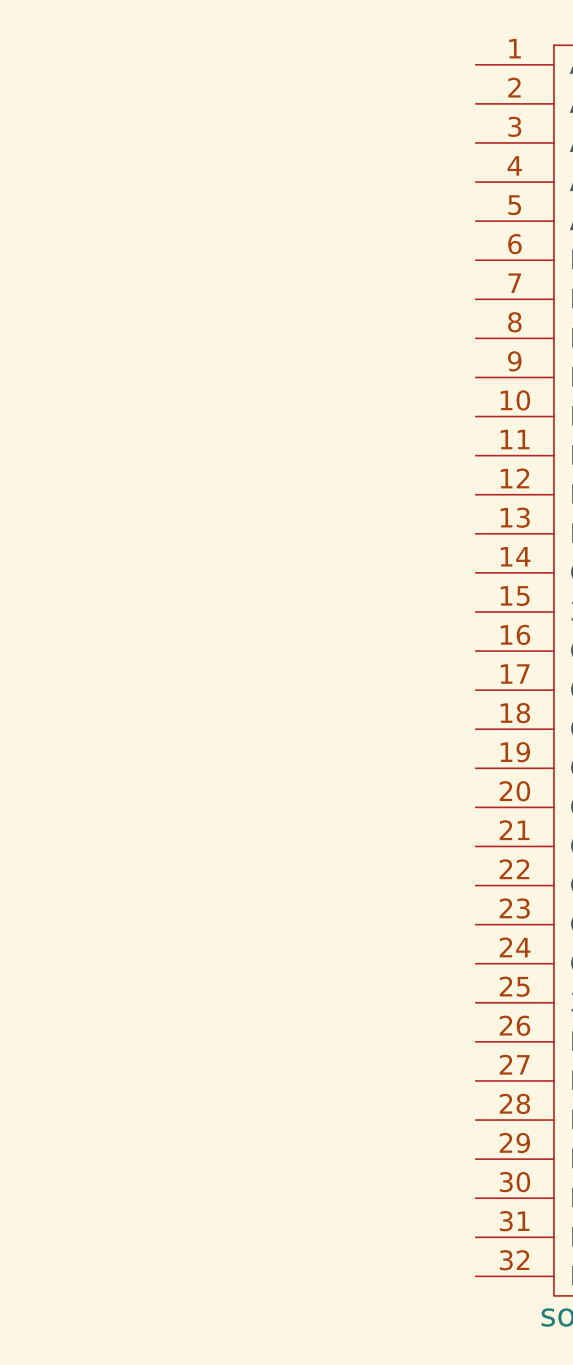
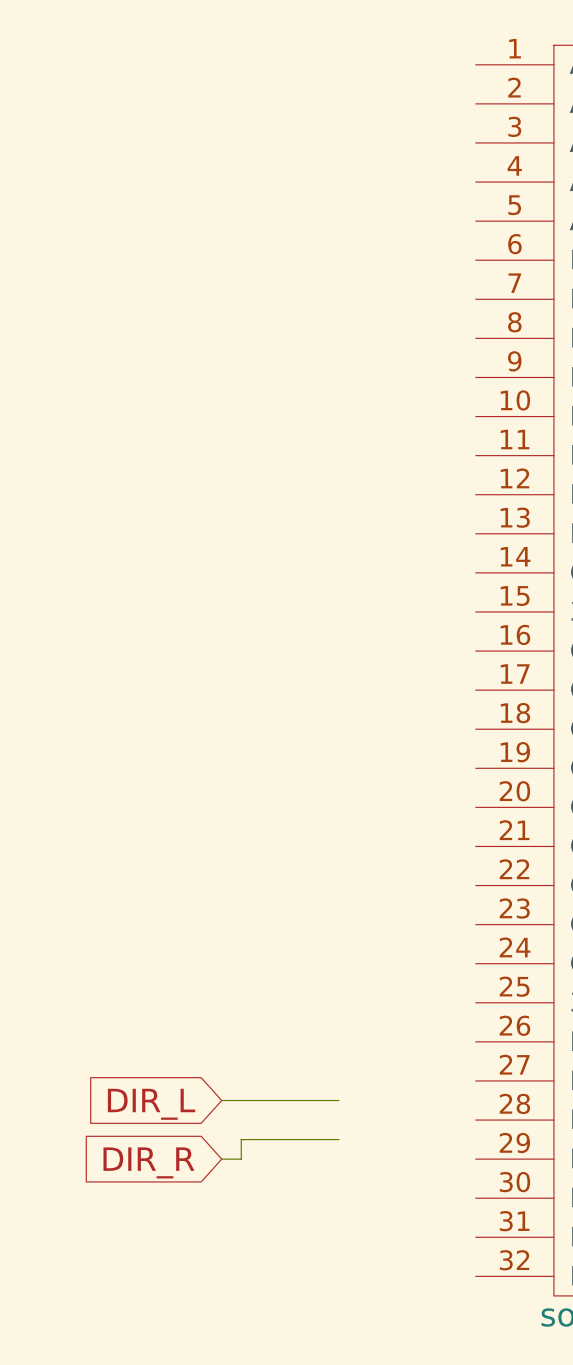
wire: none -> (221, 1100) (338, 1100)
global label: none -> DIR_L (151, 1104)
wire: none -> (338, 1139) (241, 1139) (241, 1159) (221, 1159)
global label: none -> DIR_R (148, 1162)

